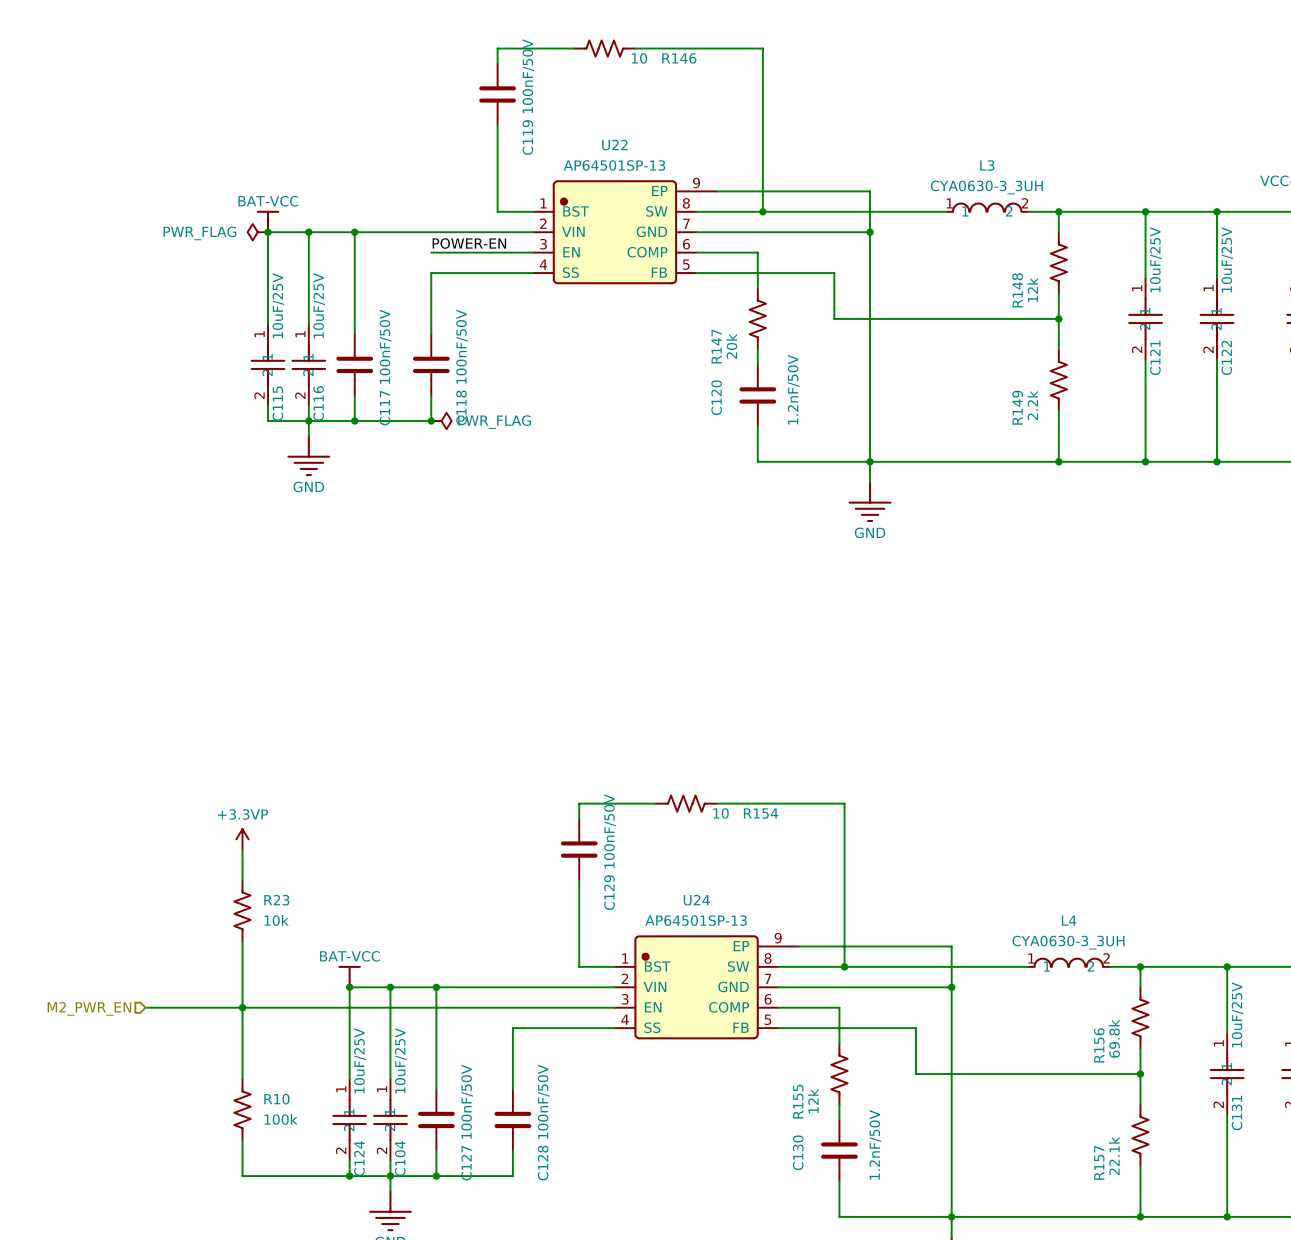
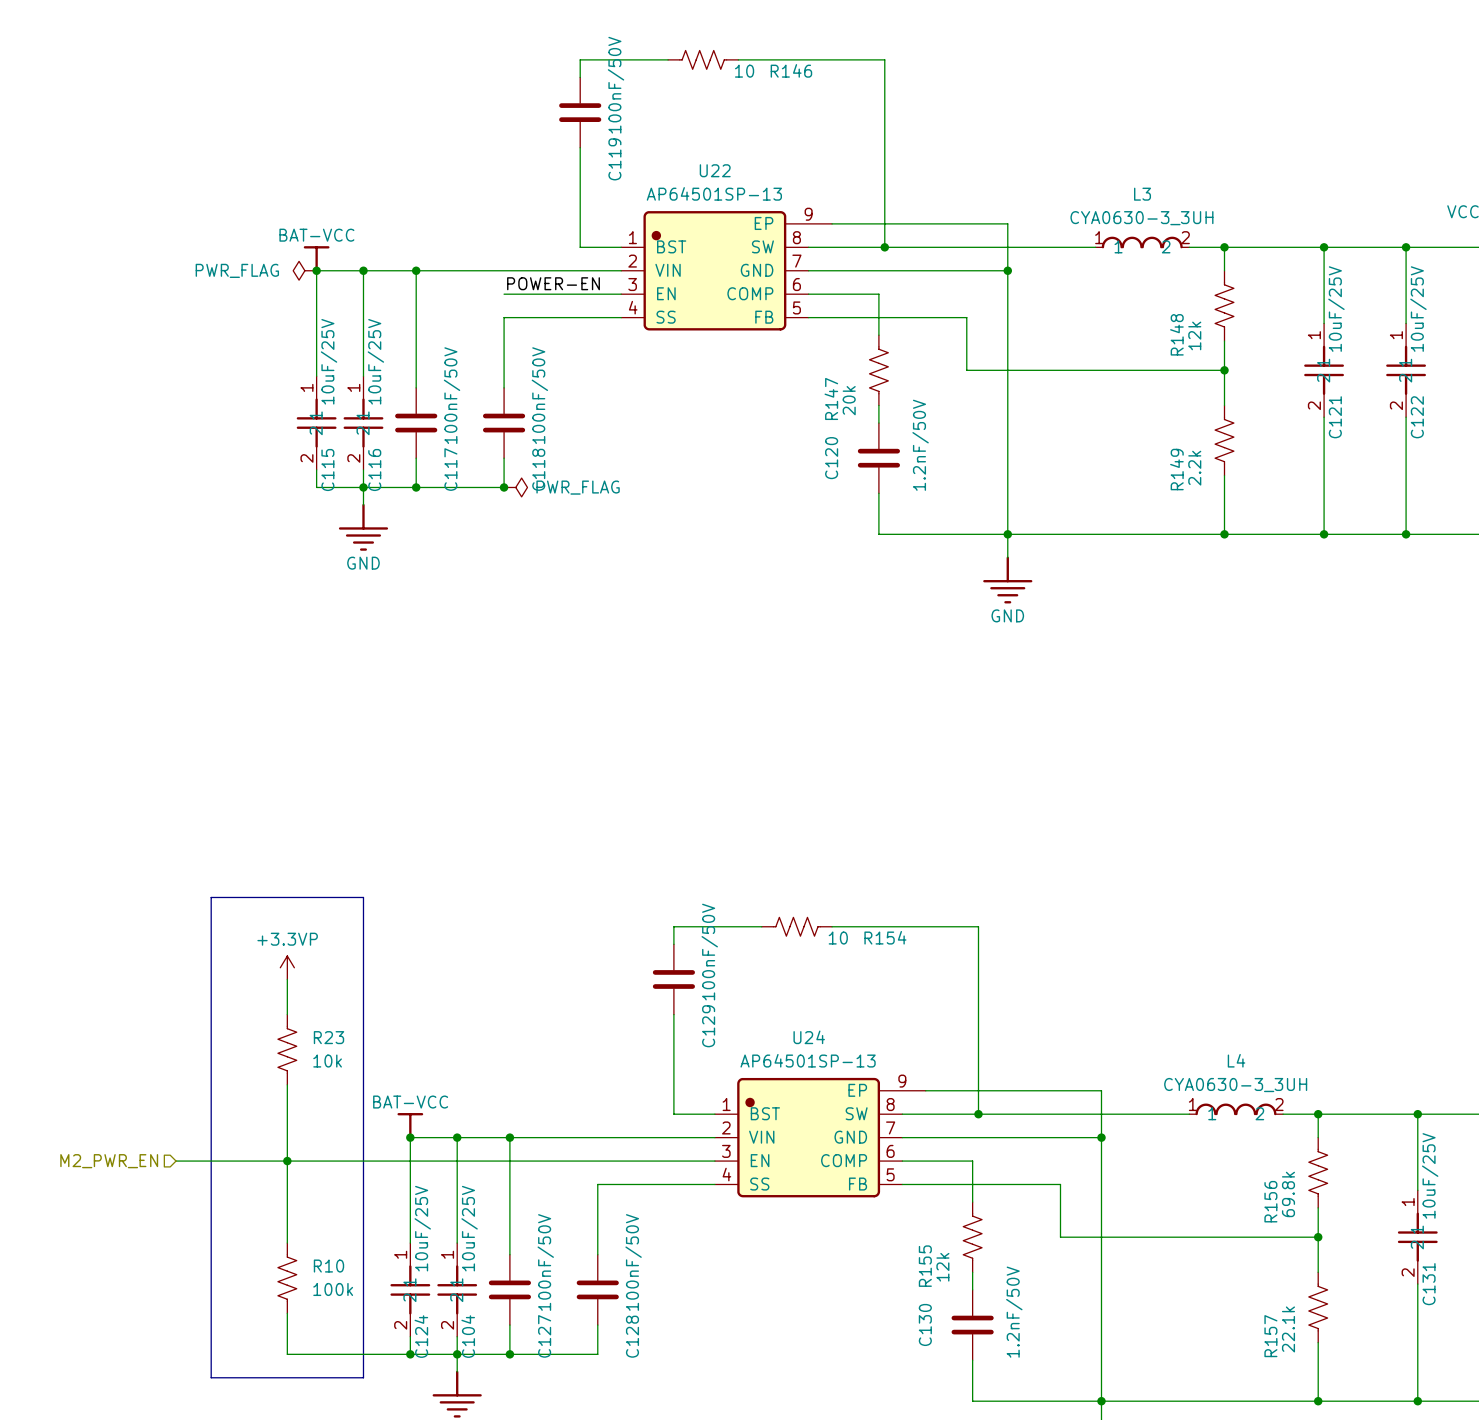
line: none -> (211, 897) (363, 897) (363, 1377) (211, 1377) (211, 897)

